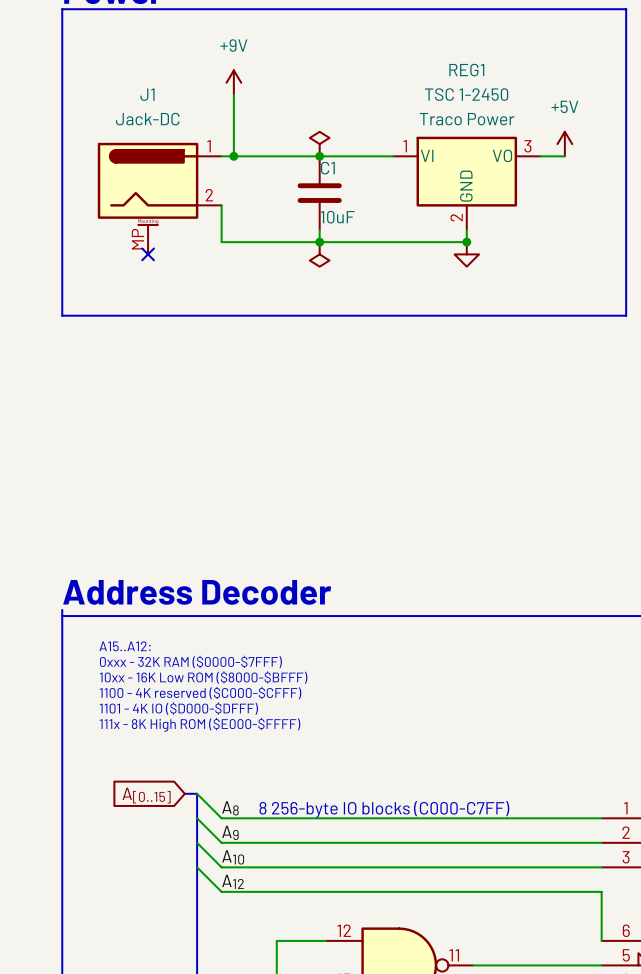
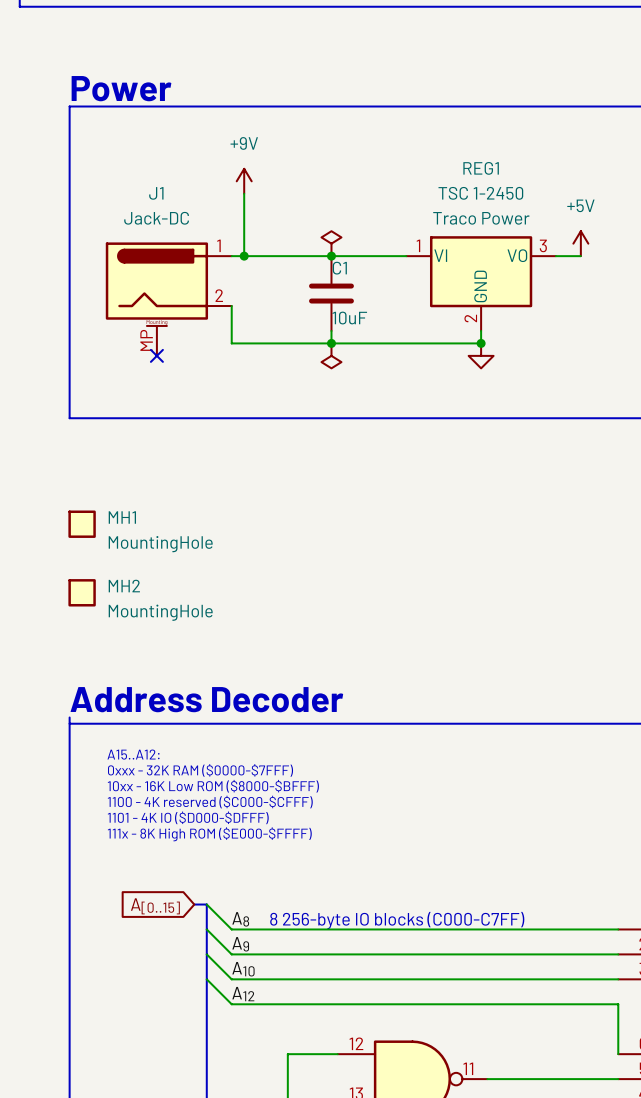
MH1: none -> MountingHole (82, 524)
MH2: none -> MountingHole (82, 592)

